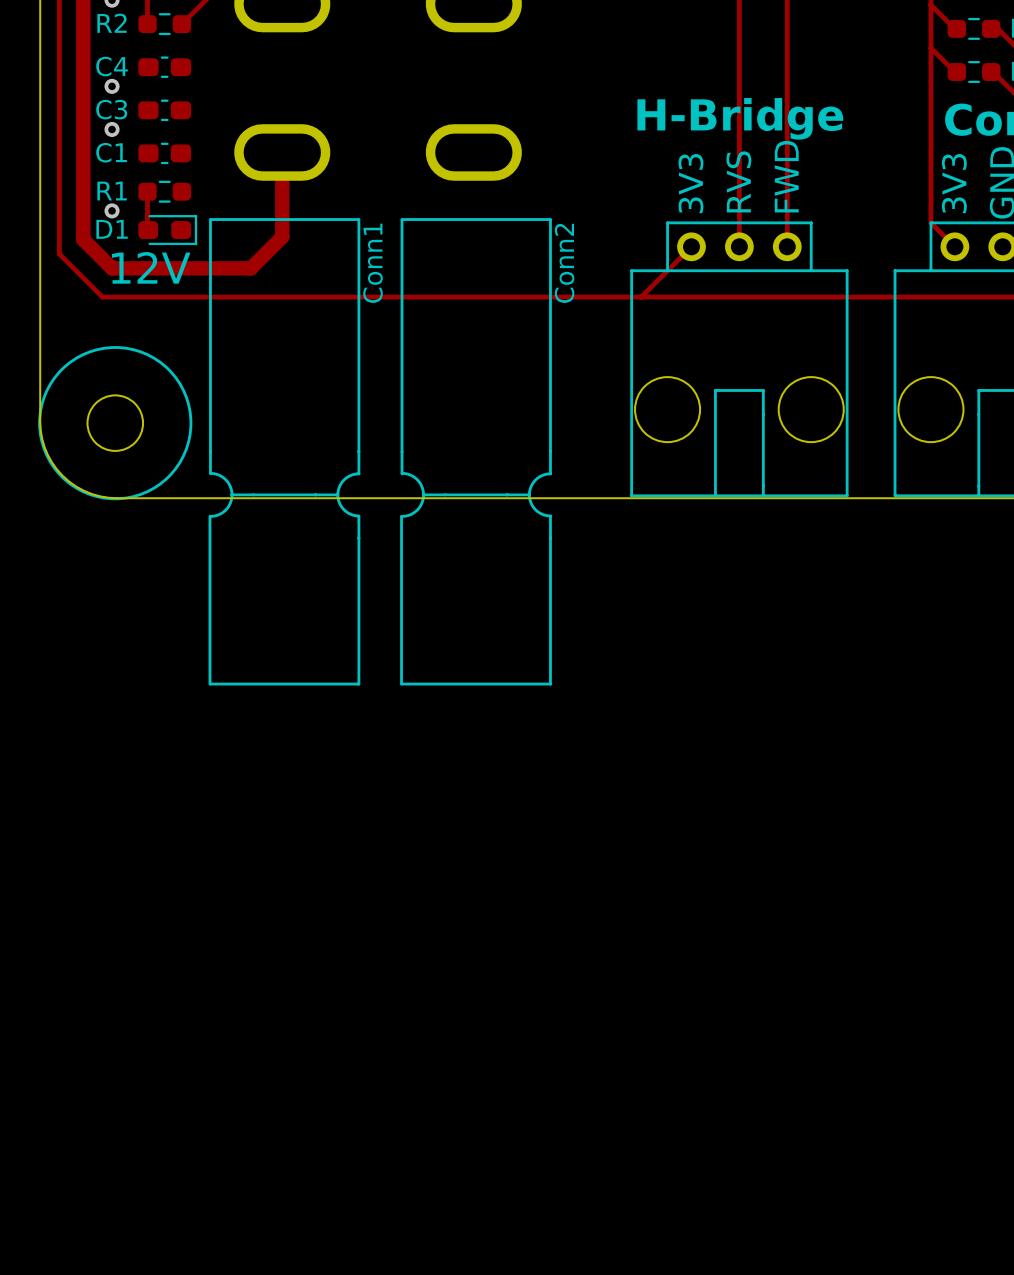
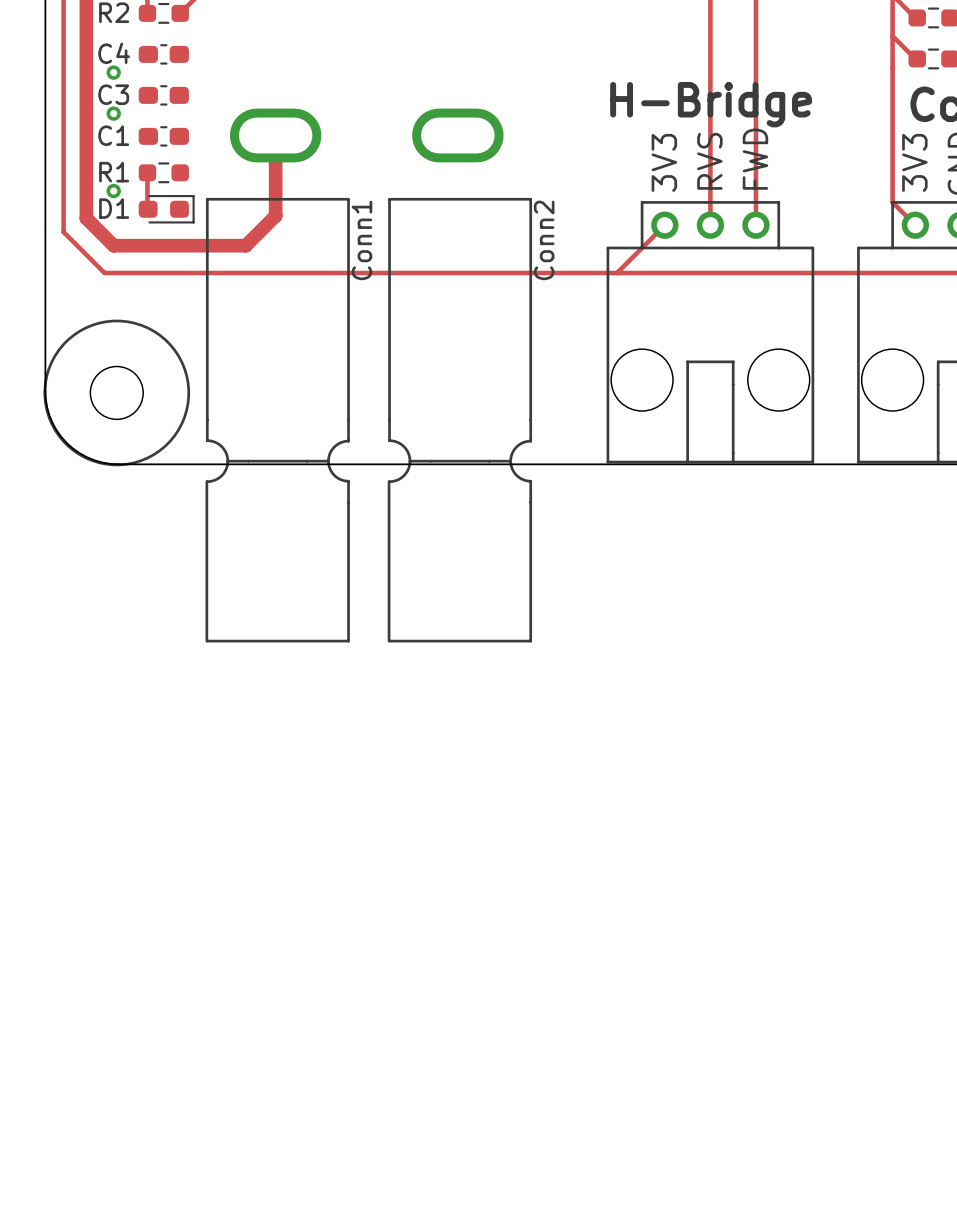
text: 12V (151, 267) -> none

